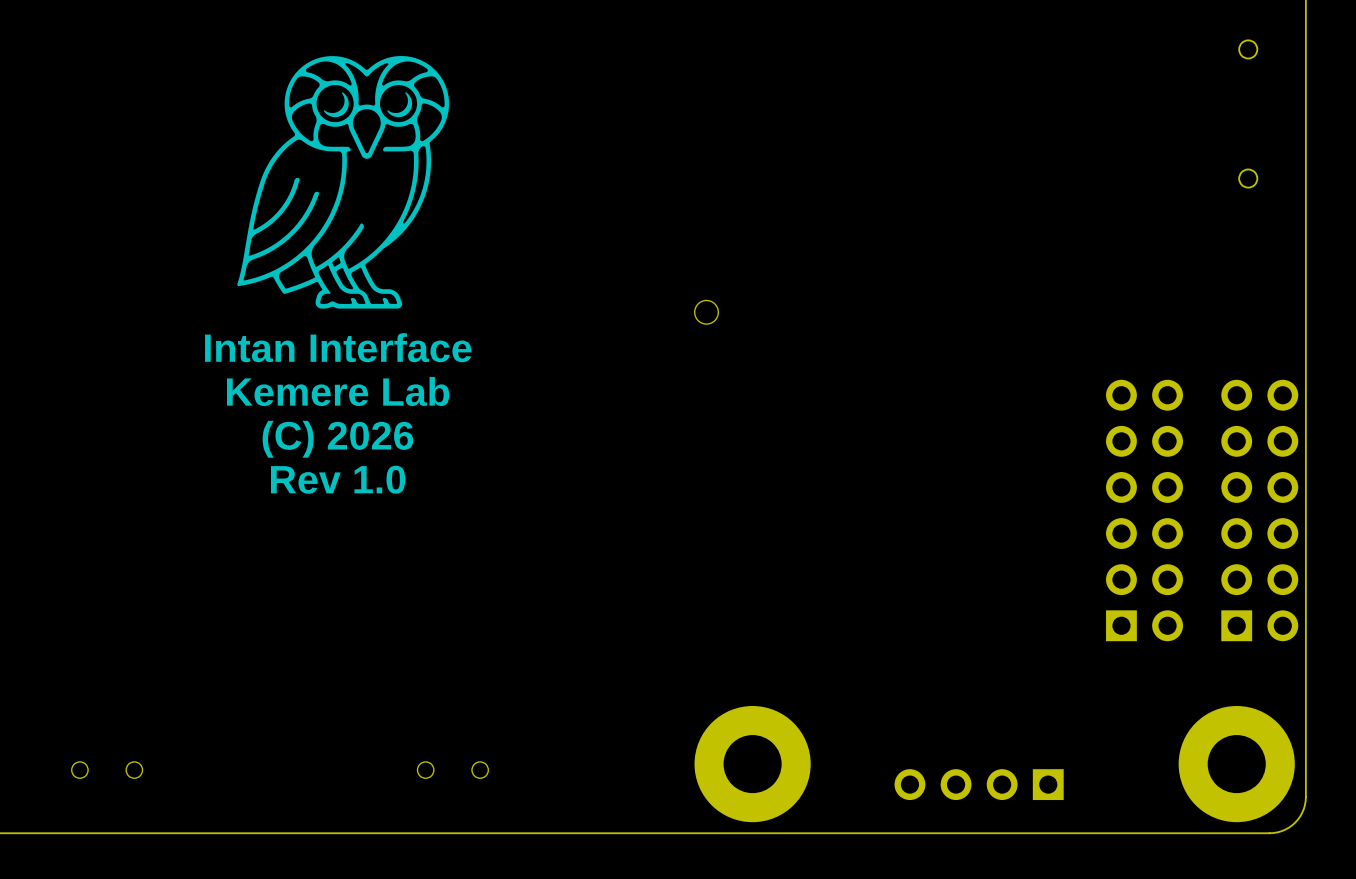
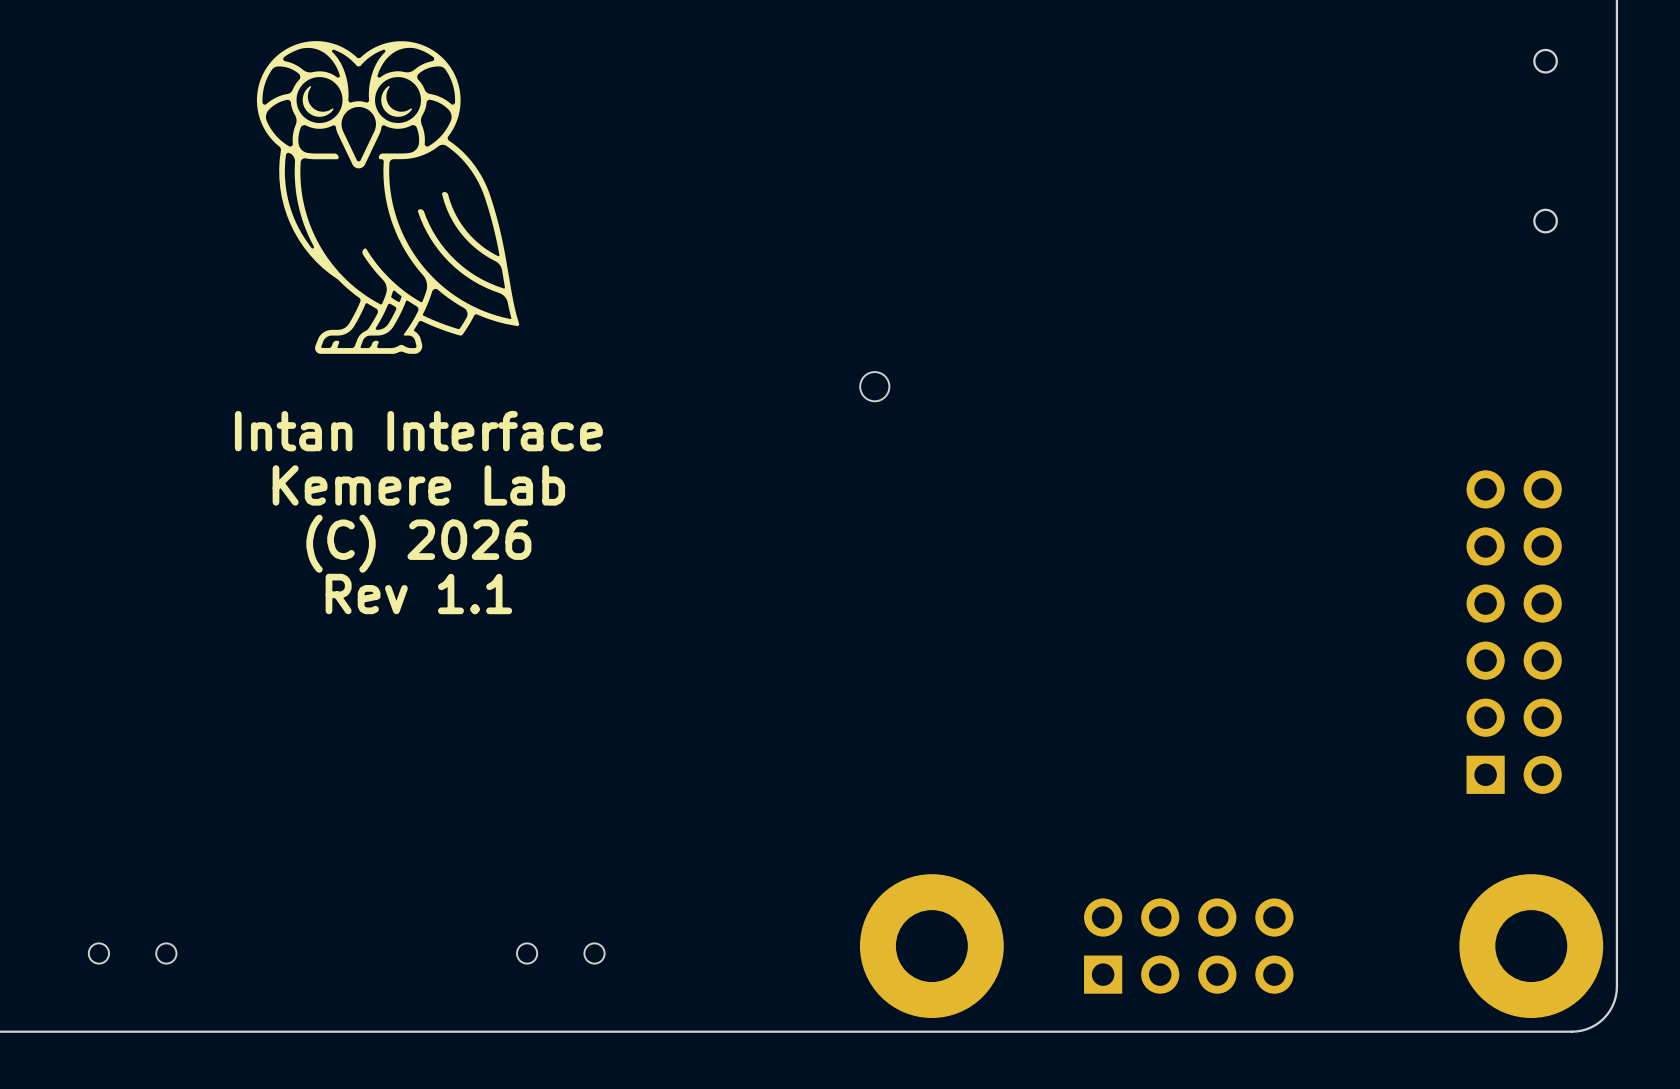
drawing: none -> [256, 41, 520, 354]
drawing: [237, 56, 450, 309] -> none
text: Rev 1.0 (338, 479) -> Rev 1.1 (418, 593)
part: (1144, 510) -> none
part position: (1259, 510) -> (1514, 632)
part: none -> (1188, 946)
part: (979, 784) -> none

